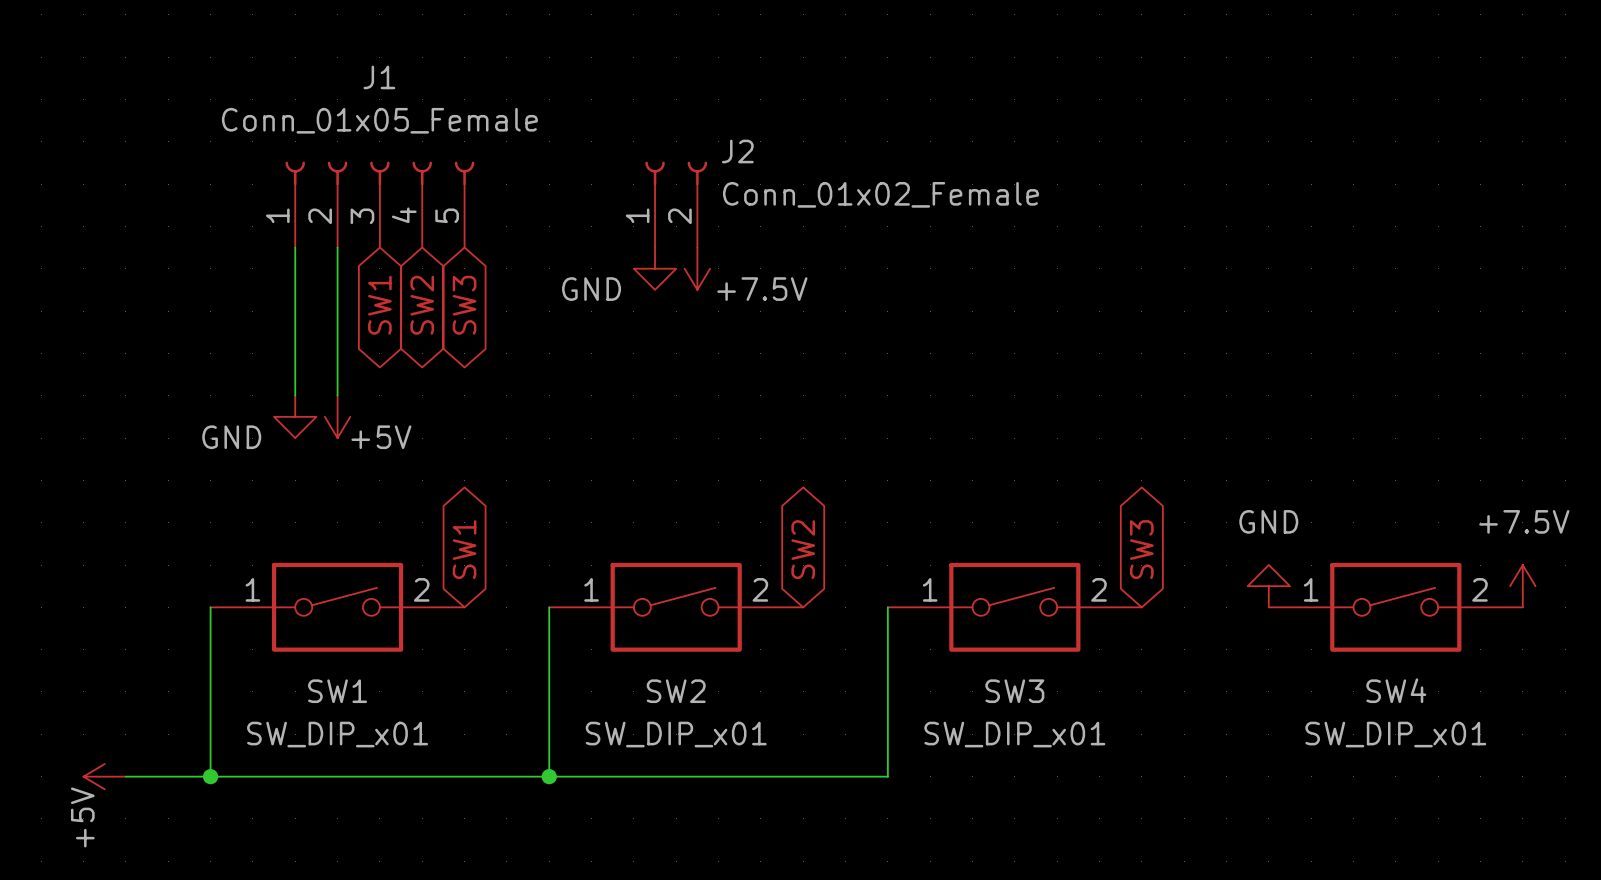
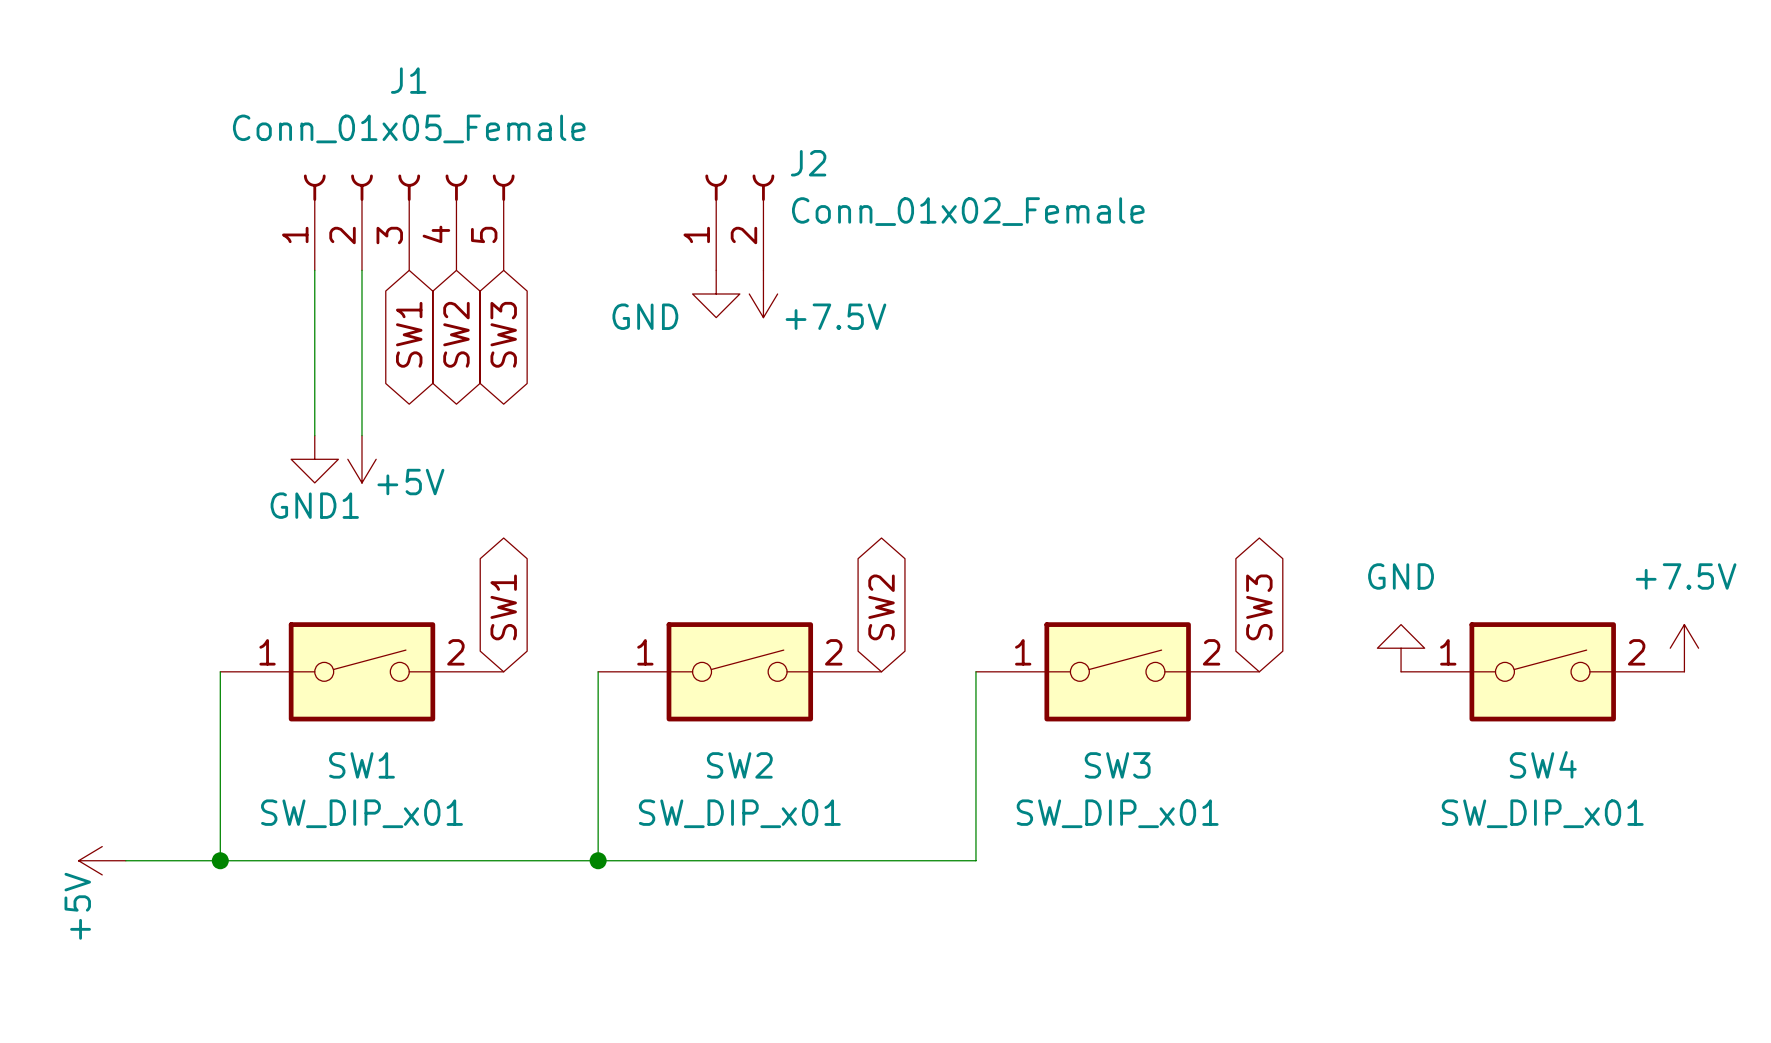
power symbol: GND (295, 416) -> GND1 (314, 459)

